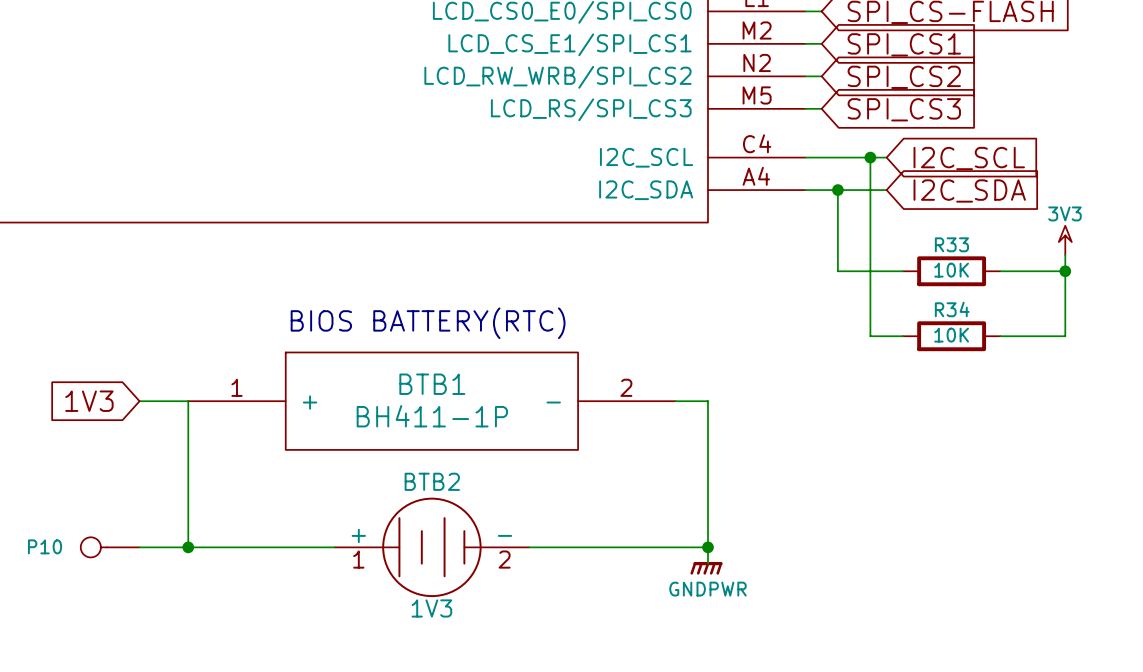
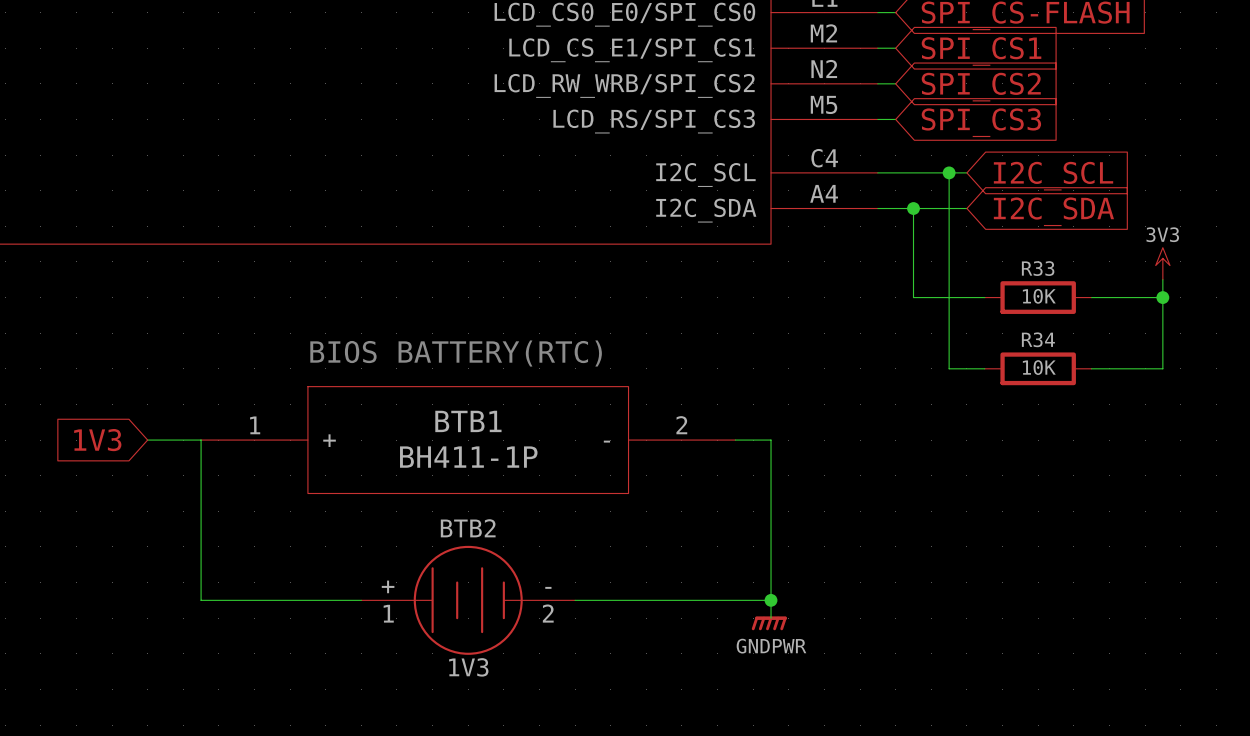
P10: (110, 547) -> none
wire: (139, 547) (188, 547) -> none
junction: (188, 547) -> none

